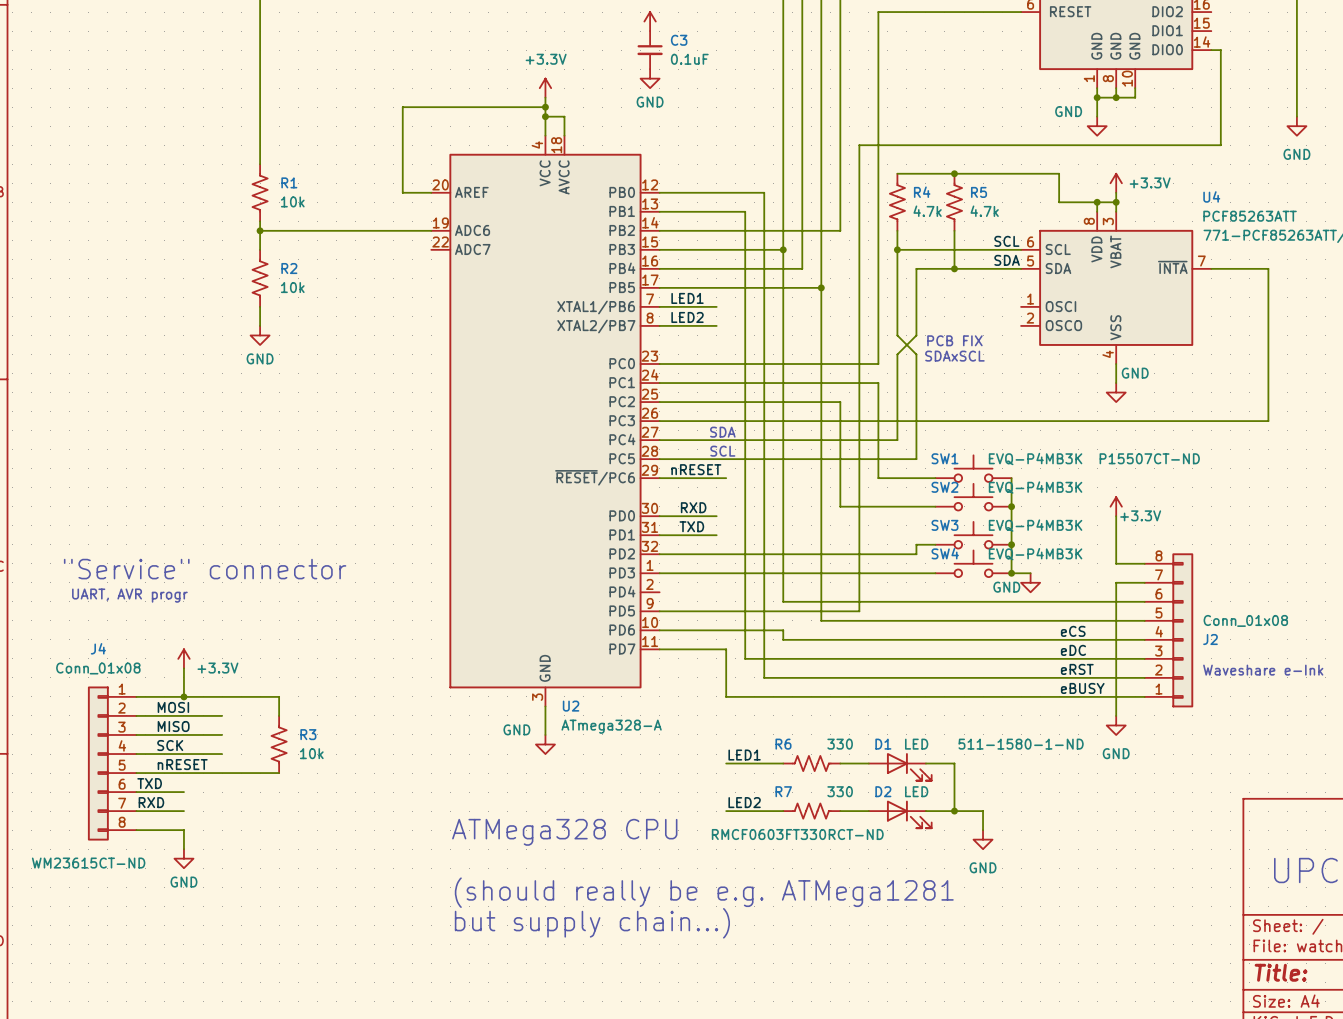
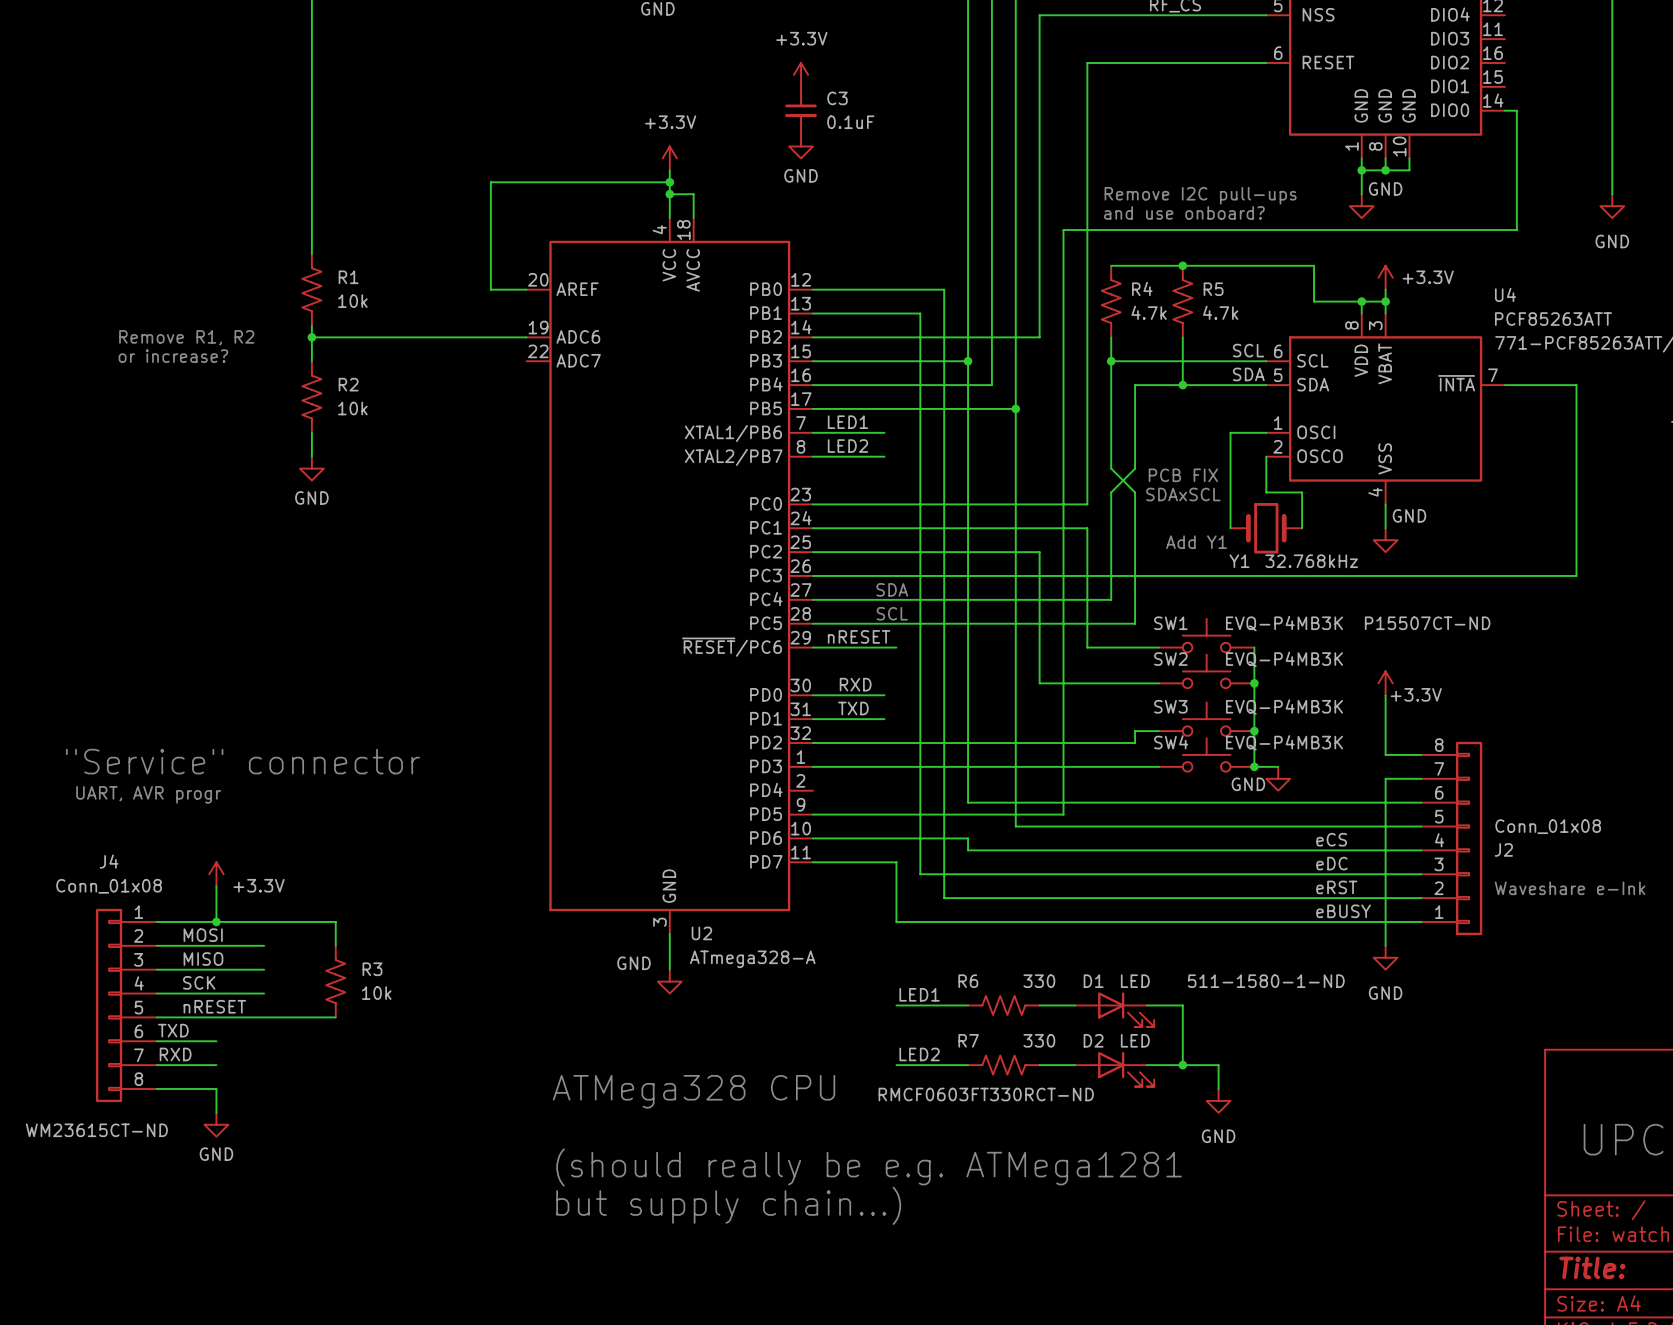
power symbol text position: GND (1068, 111) -> GND (1385, 189)
text: none -> Remove I2C pull-ups (1200, 195)
text: none -> and use onboard? (1184, 212)
text: none -> Remove R1, R2 (186, 337)
text: none -> or increase? (173, 356)
wire: none -> (1266, 432) (1230, 432) (1230, 528)
wire: none -> (1266, 456) (1266, 492) (1302, 492) (1302, 528)
Y1: none -> 32.768kHz (1266, 528)
text: none -> Add Y1 (1196, 542)

